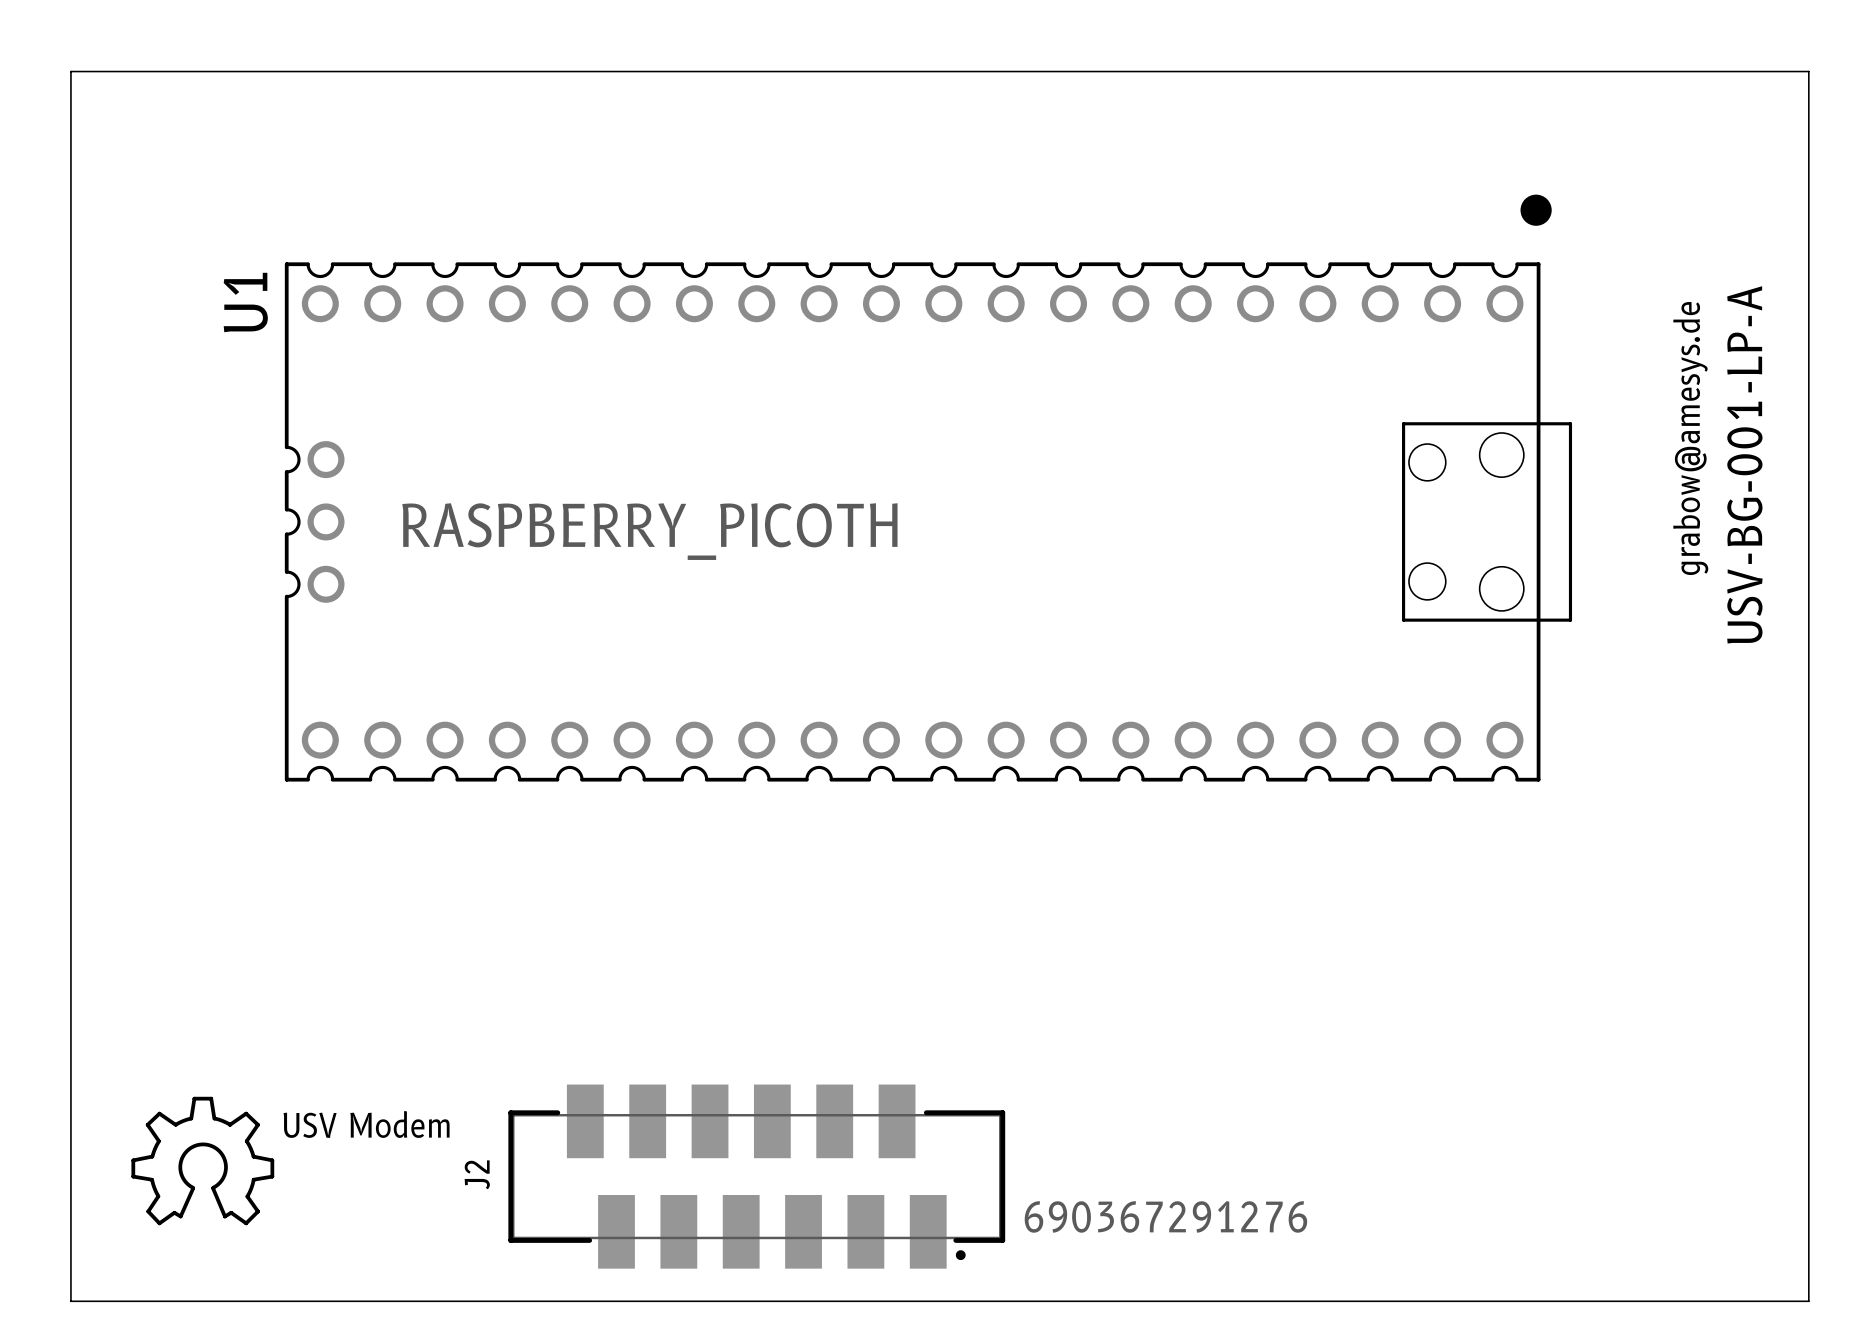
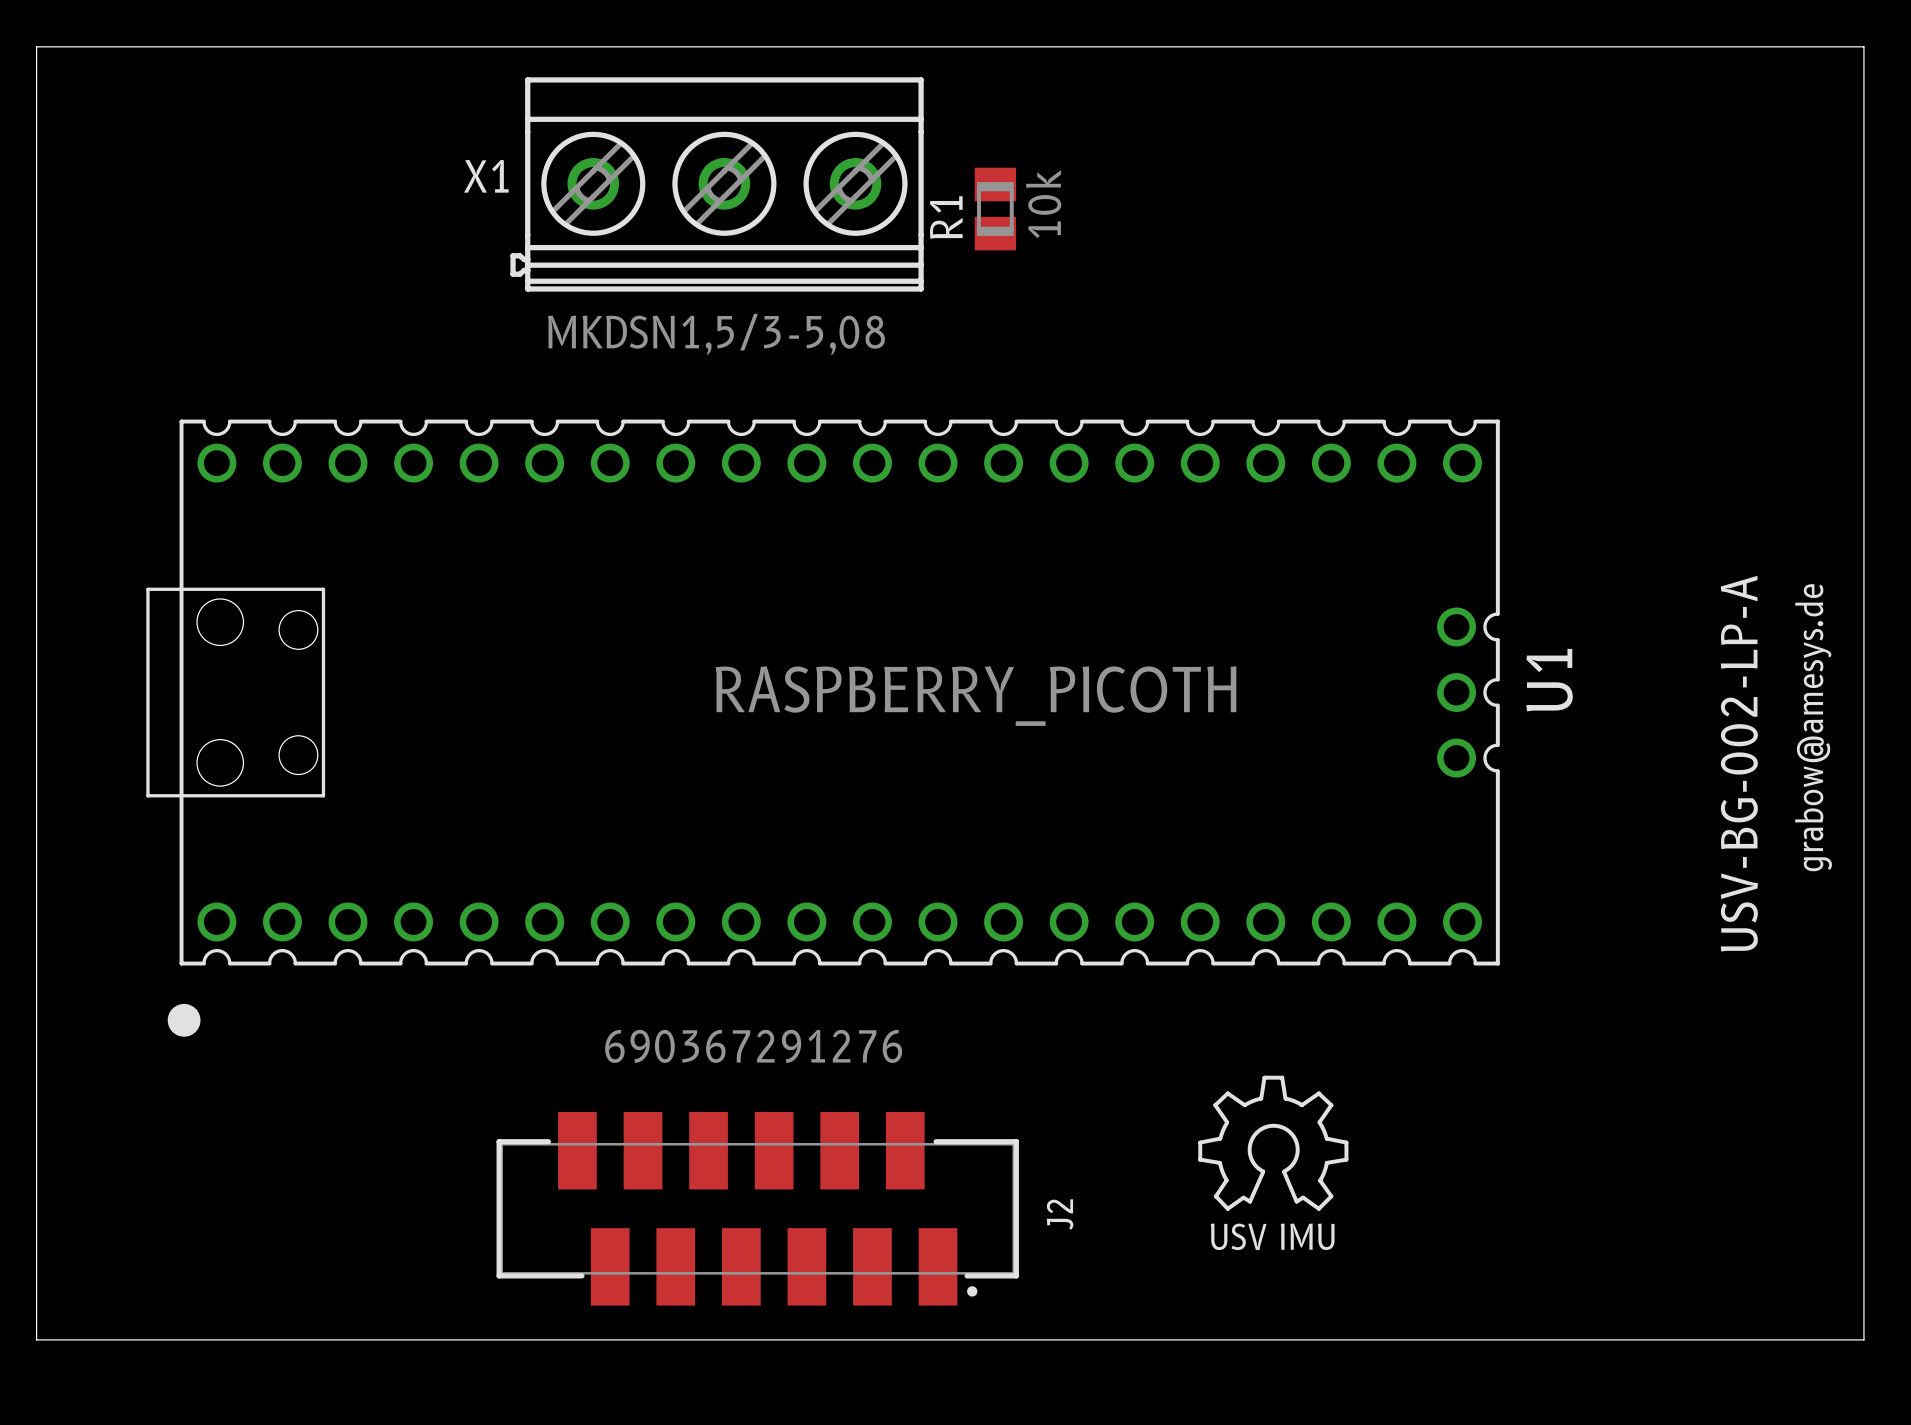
X1: none -> MKDSN1,5/3-5,08 (717, 184)
R1: none -> 10k (995, 209)
U1 name position: U1 (245, 302) -> U1 (1549, 680)
text position: grabow@amesys.de (1690, 438) -> grabow@amesys.de (1813, 727)
text: USV-BG-001-LP-A (1744, 464) -> USV-BG-002-LP-A (1739, 763)
U1 rotation: 0° (928, 488) -> 180° (823, 728)
U1 value position: RASPBERRY_PICOTH (649, 531) -> RASPBERRY_PICOTH (975, 696)
drawing: none -> [1198, 1075, 1349, 1211]
drawing: [131, 1096, 275, 1226] -> none
text: USV Modem (366, 1124) -> none
J2 name position: J2 (477, 1174) -> J2 (1060, 1214)
text: none -> USV IMU (1272, 1236)
J2 value position: 690367291276 (1165, 1216) -> 690367291276 (753, 1046)

